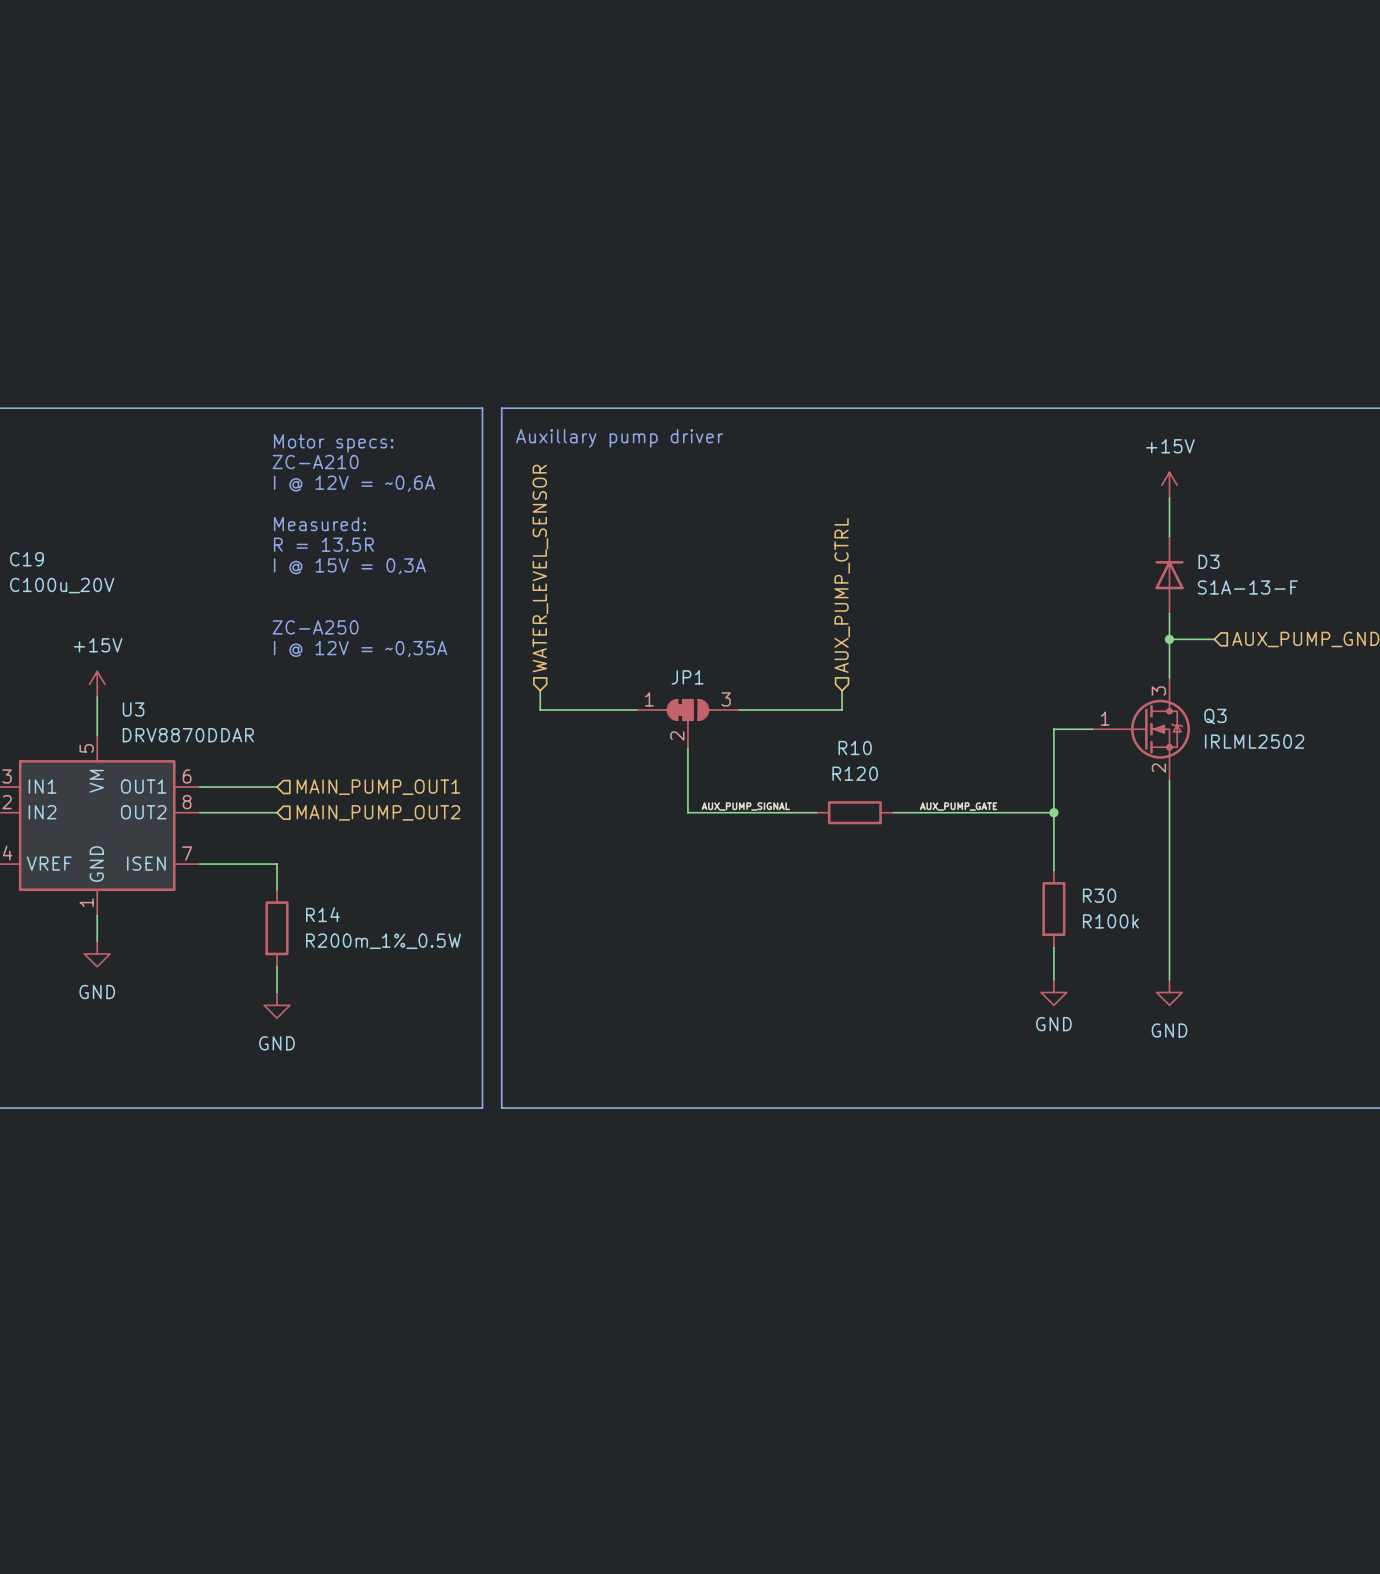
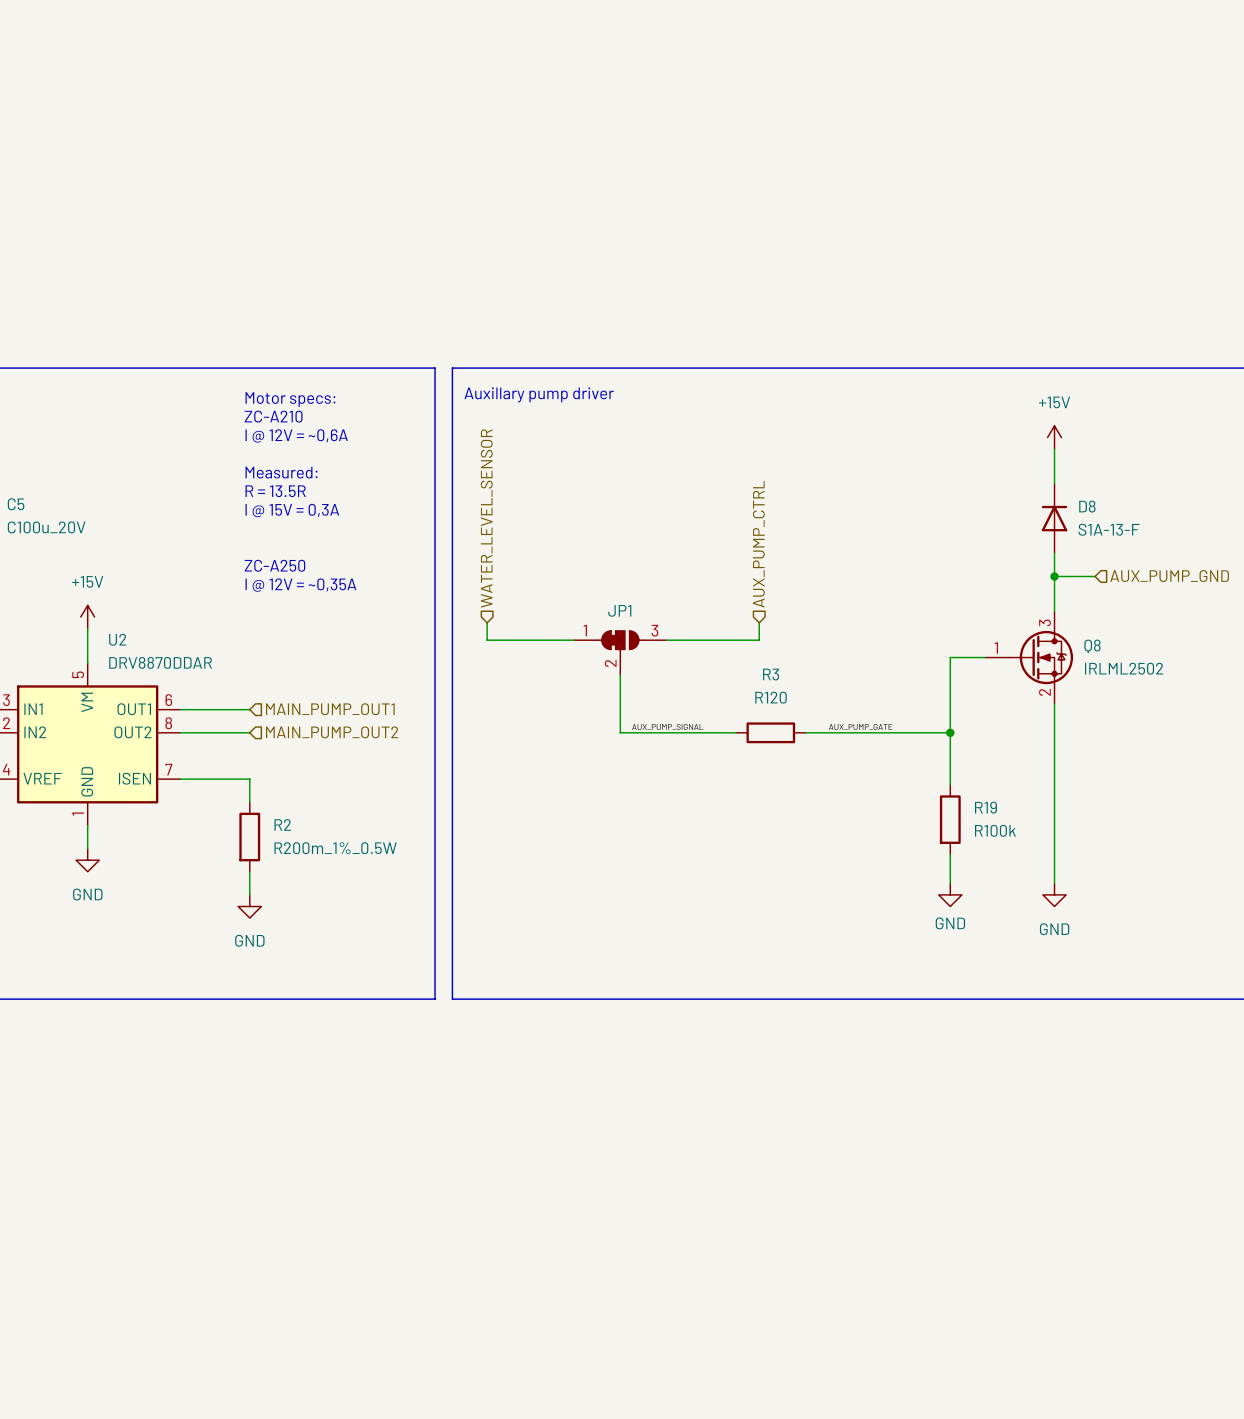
C19 name: C19 (27, 559) -> C5 (16, 504)
D3 name: D3 (1209, 561) -> D8 (1087, 506)
U3 name: U3 (133, 709) -> U2 (117, 639)
Q3 name: Q3 (1215, 716) -> Q8 (1092, 646)
R10 name: R10 (855, 748) -> R3 (771, 674)
R30 name: R30 (1099, 895) -> R19 (985, 807)
R14 name: R14 (322, 914) -> R2 (282, 824)

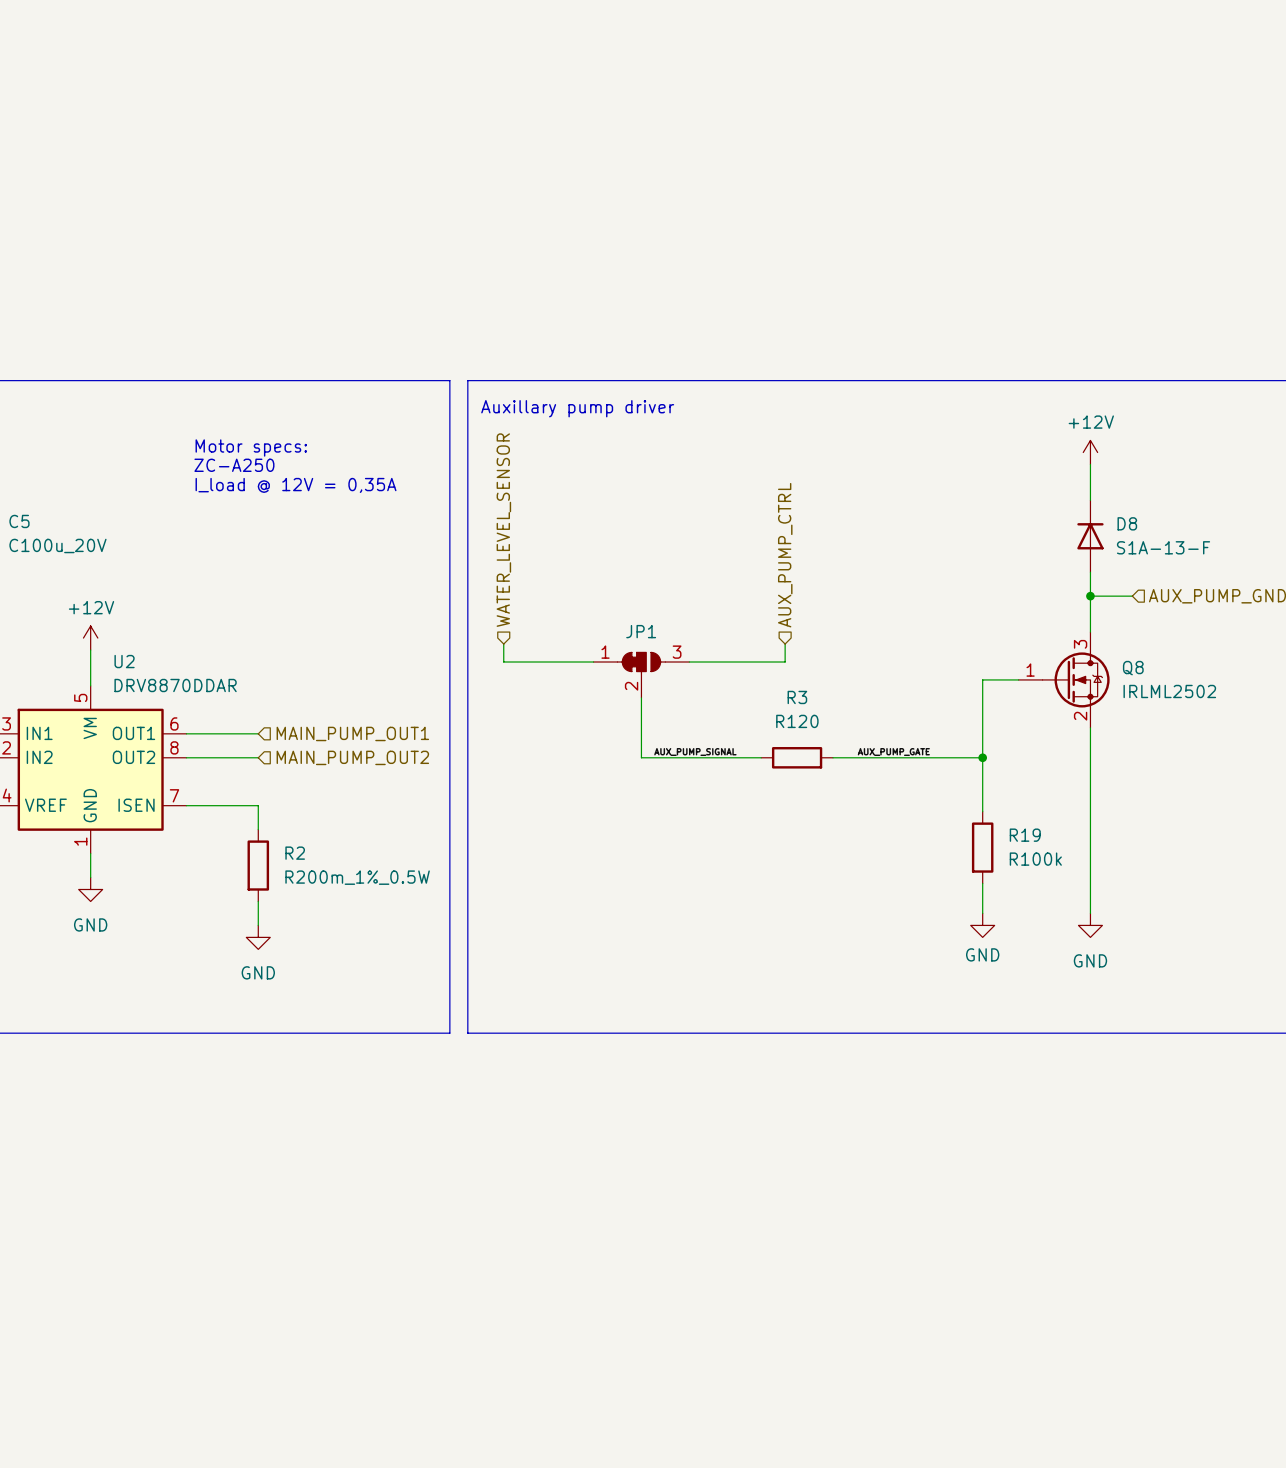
text position: Motor specs: (290, 399) -> Motor specs: (251, 448)
text: ZC-A210 (273, 416) -> none
text: I @ 12V = ~0,6A (296, 435) -> none
power symbol: +15V (1054, 437) -> +12V (1090, 452)
text: none -> I_load @ 12V = 0,35A (296, 485)
text: Measured: (281, 472) -> none
text: R = 13.5R (275, 491) -> none
text: I @ 15V = 0,3A (292, 510) -> none
text position: ZC-A250 (274, 565) -> ZC-A250 (234, 465)
text: I @ 12V = ~0,35A (300, 585) -> none
power symbol: +15V (87, 617) -> +12V (90, 638)

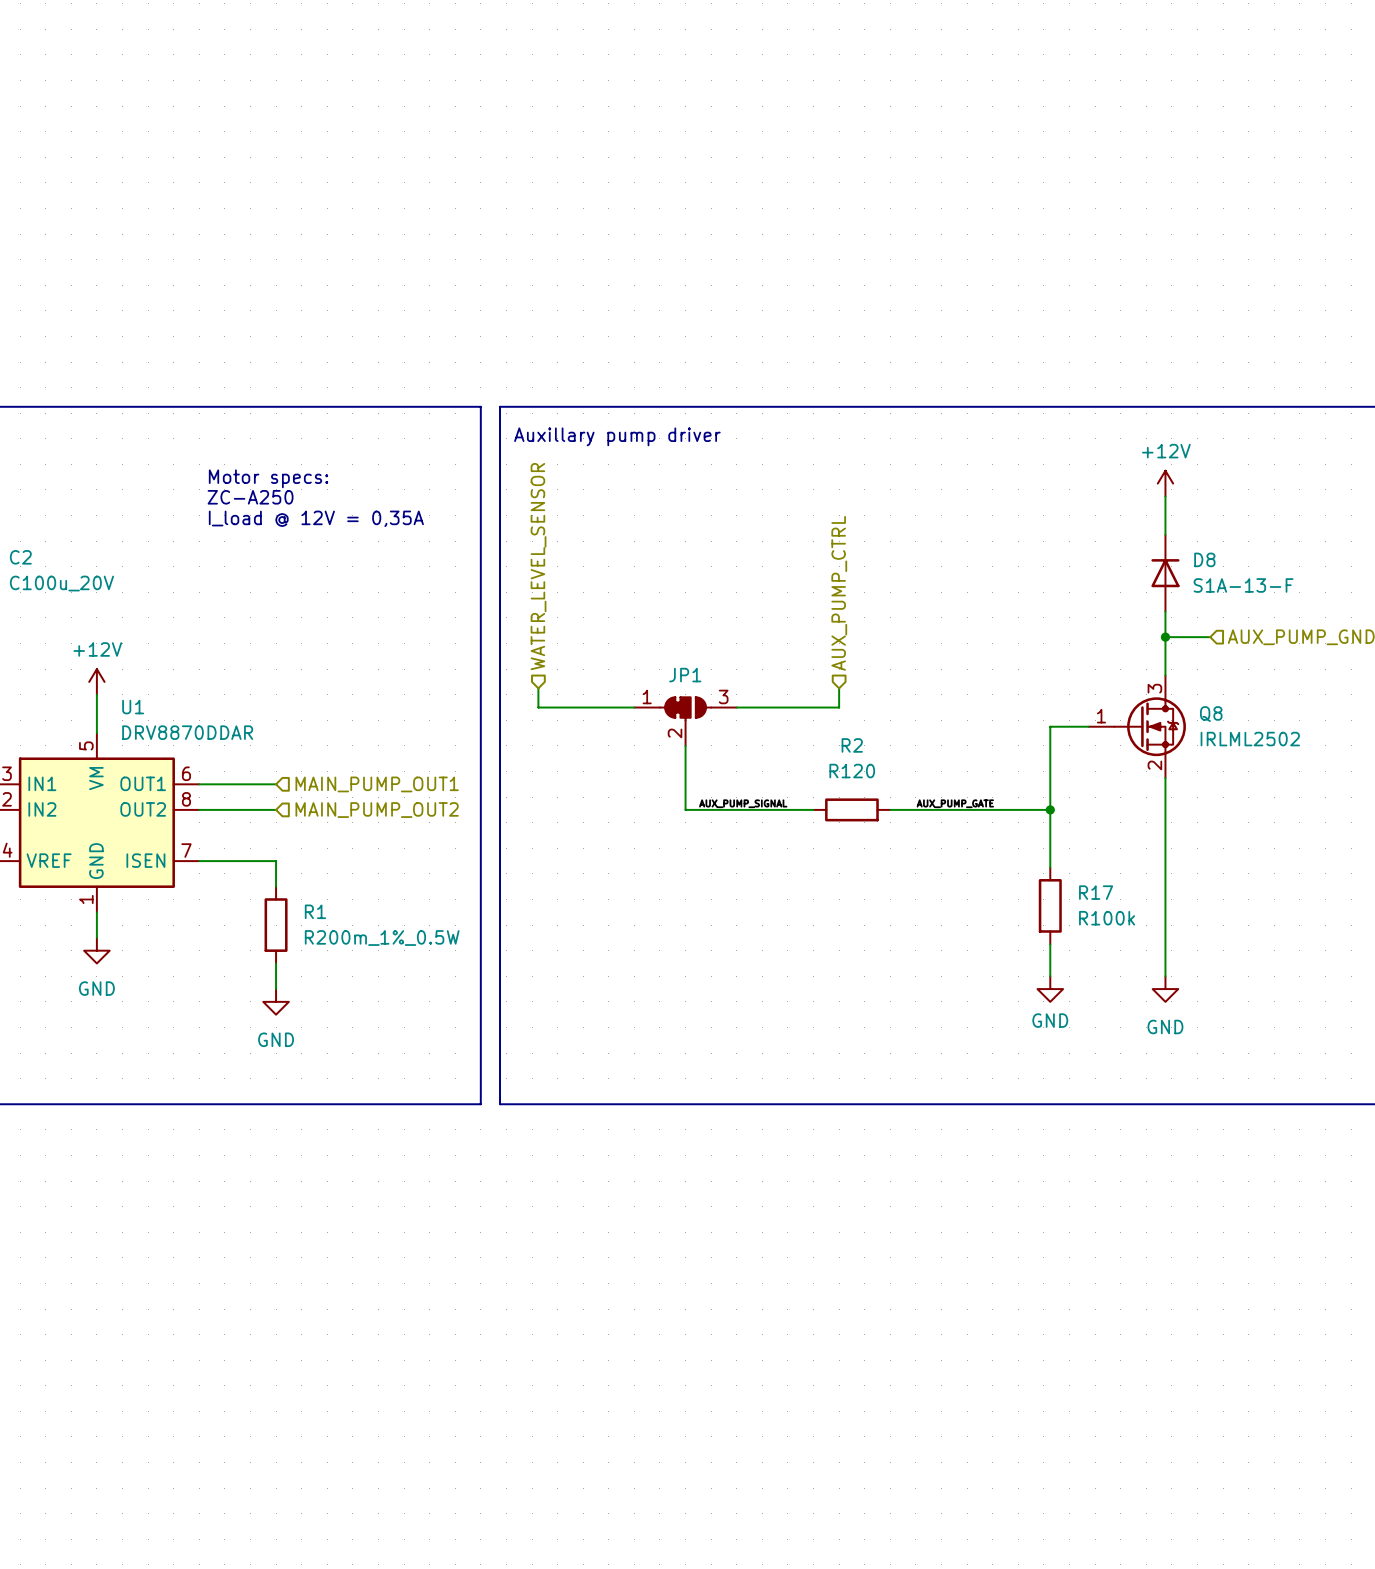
C5 name: C5 (19, 521) -> C2 (20, 557)
U2 name: U2 (124, 661) -> U1 (133, 707)
R3 name: R3 (797, 697) -> R2 (852, 745)
R19 name: R19 (1025, 835) -> R17 (1096, 892)
R2 name: R2 (295, 853) -> R1 (315, 911)

